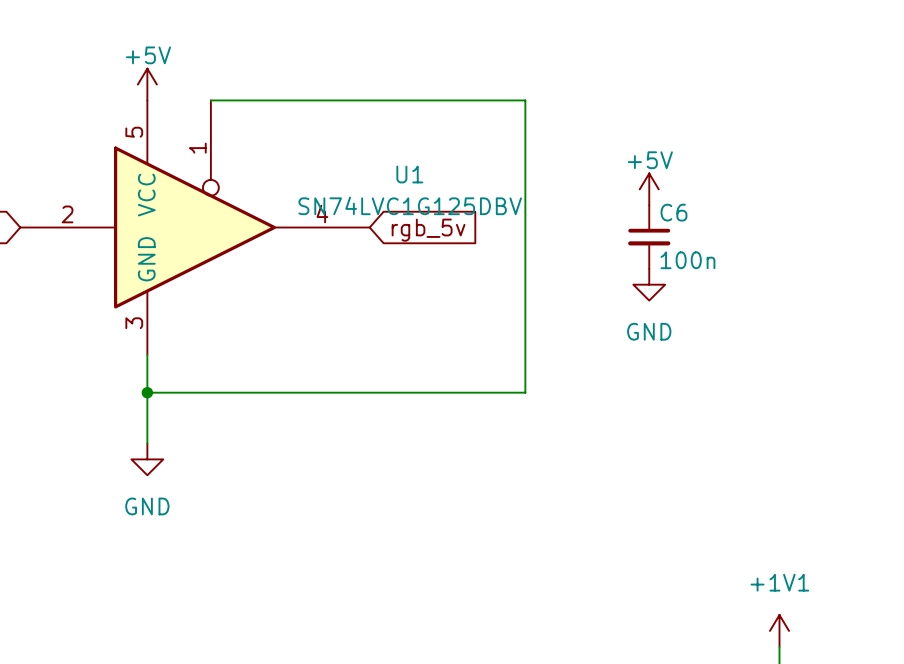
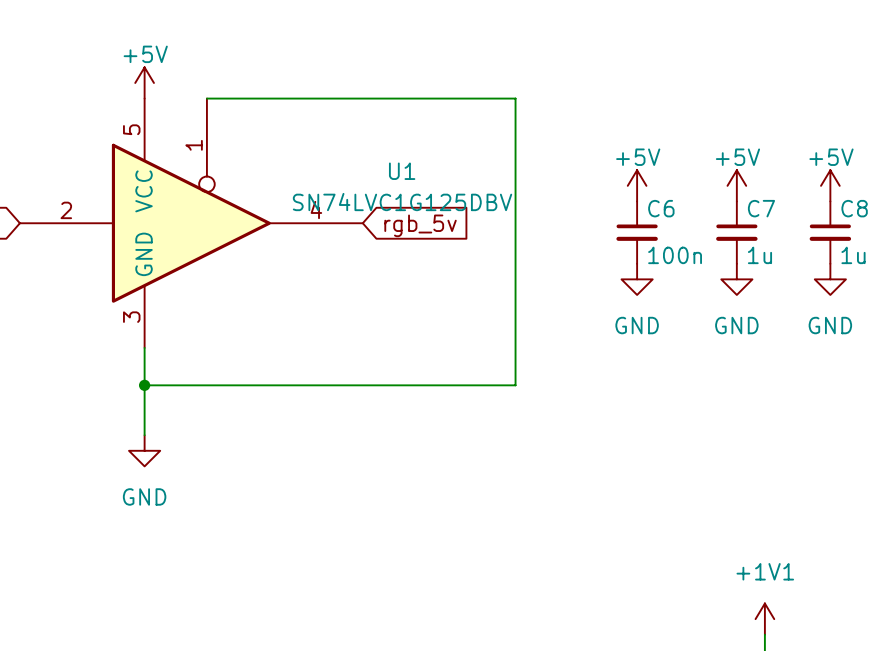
power symbol: none -> +5V (736, 185)
power symbol: none -> +5V (830, 185)
C7: none -> 1u (736, 232)
C8: none -> 1u (830, 232)
power symbol: none -> GND (736, 279)
power symbol: none -> GND (830, 279)

